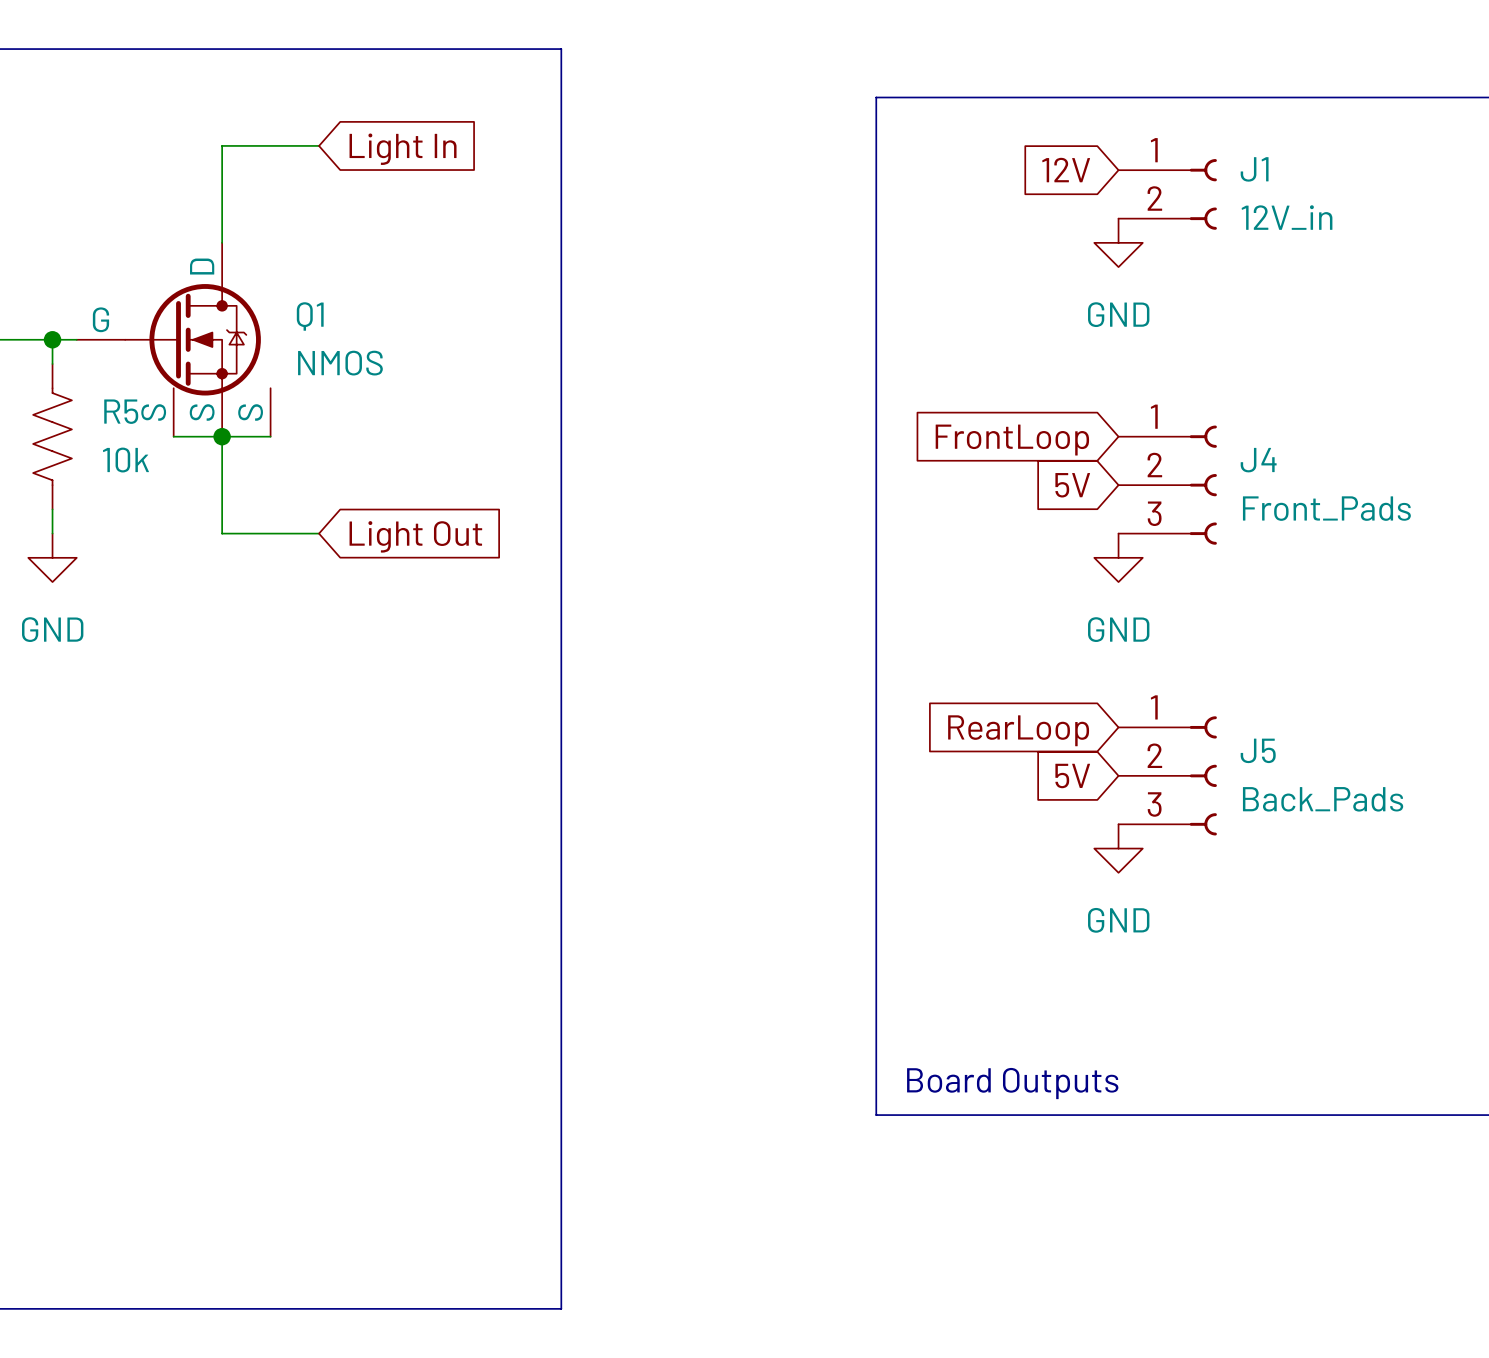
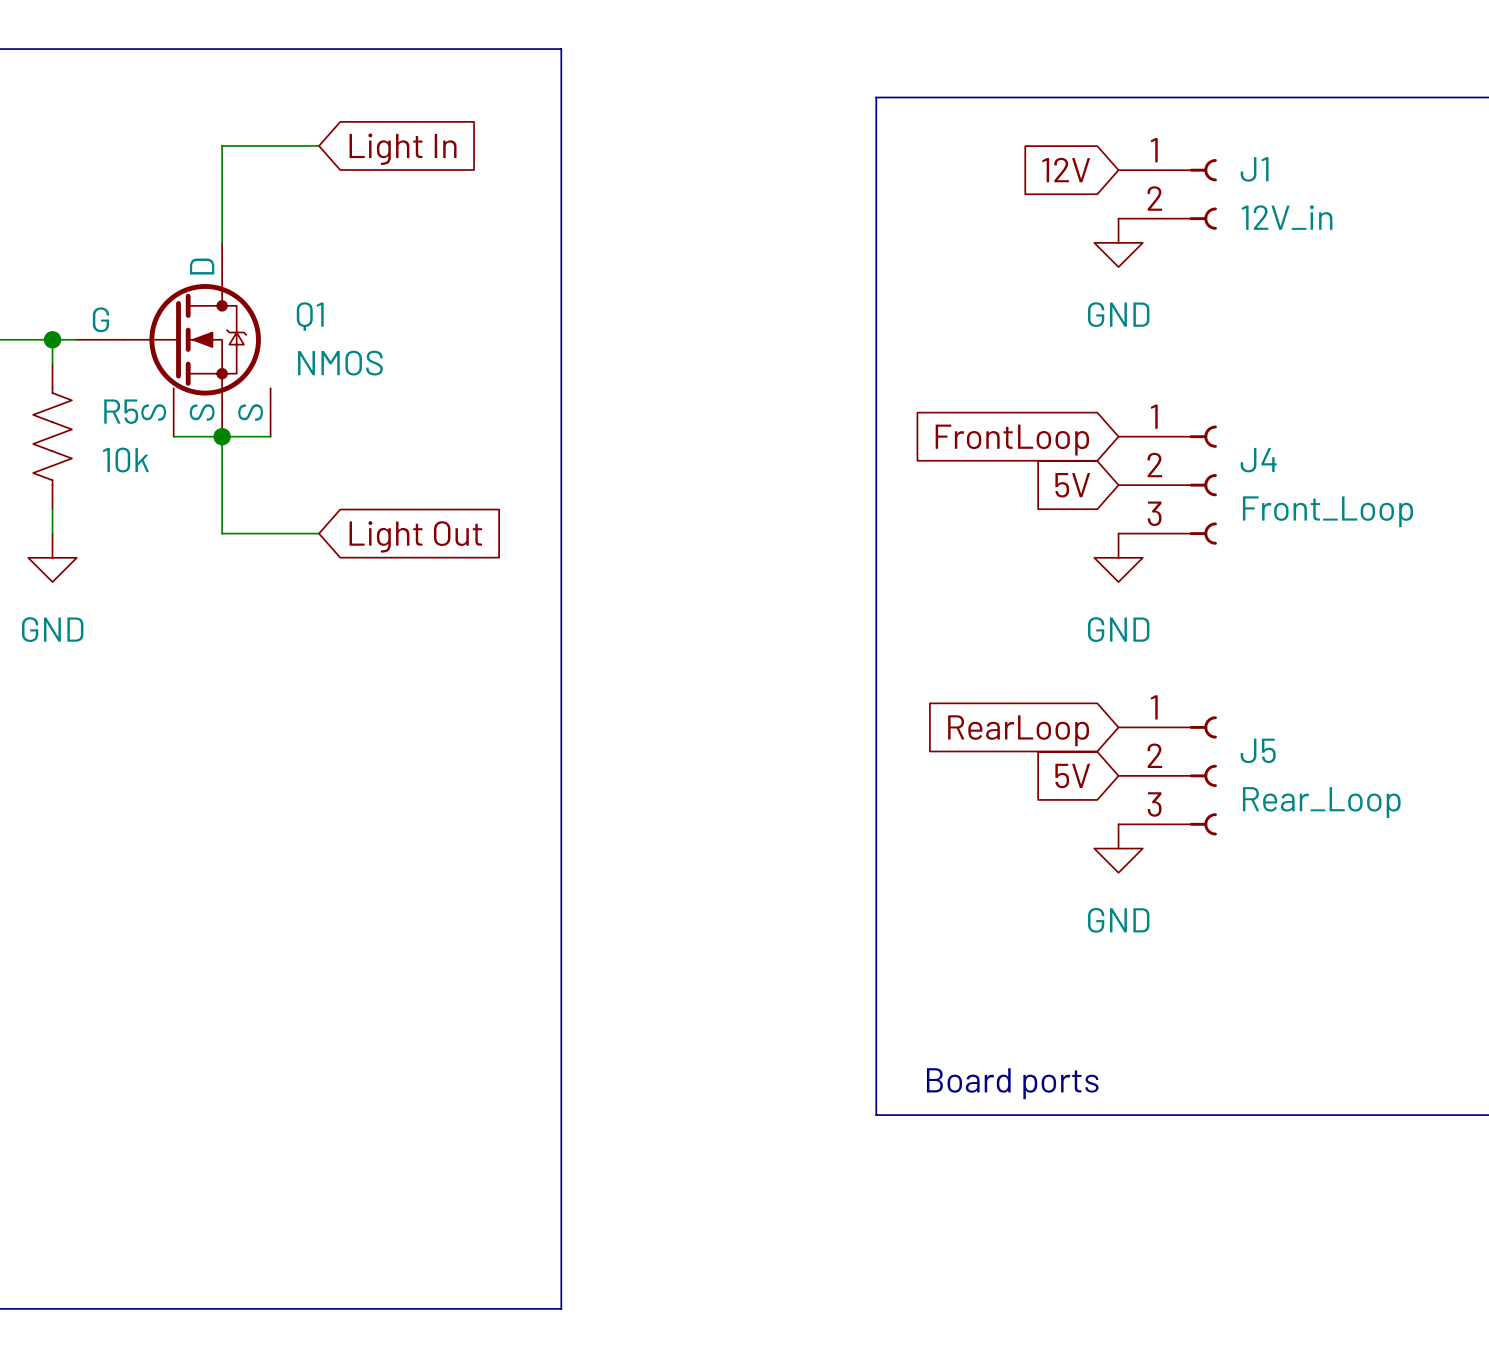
J4 value: Front_Pads (1326, 508) -> Front_Loop (1328, 511)
J5 value: Back_Pads (1323, 799) -> Rear_Loop (1321, 802)
text: Board Outputs (1012, 1083) -> Board ports (1012, 1083)

